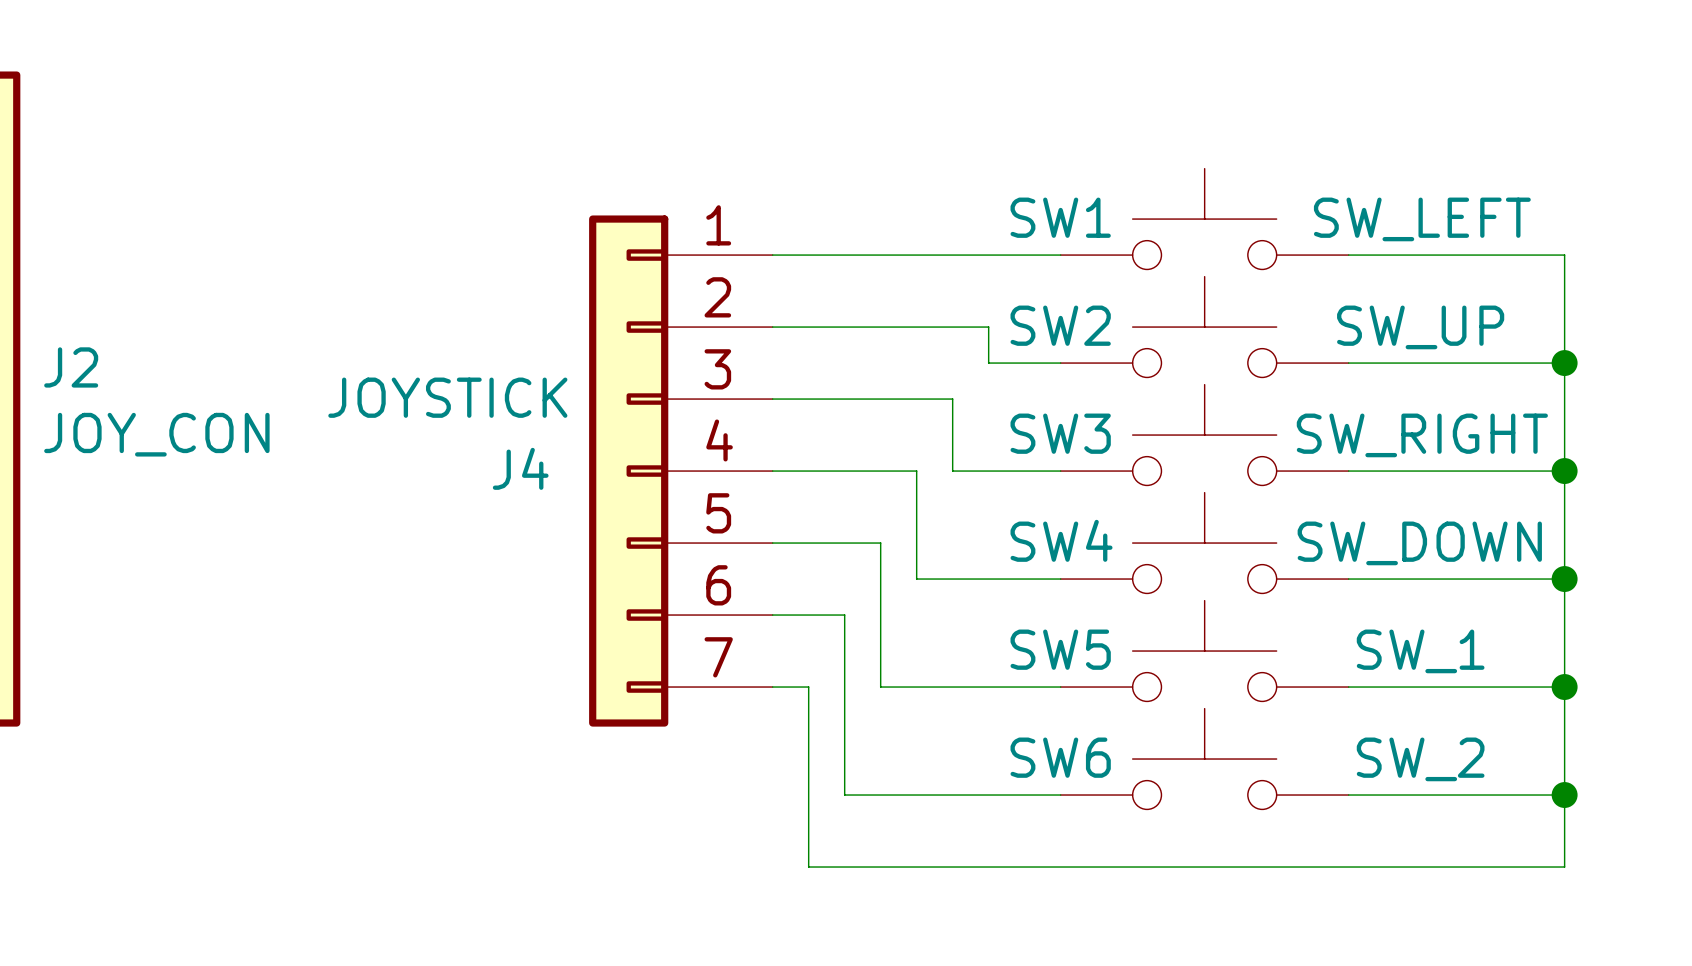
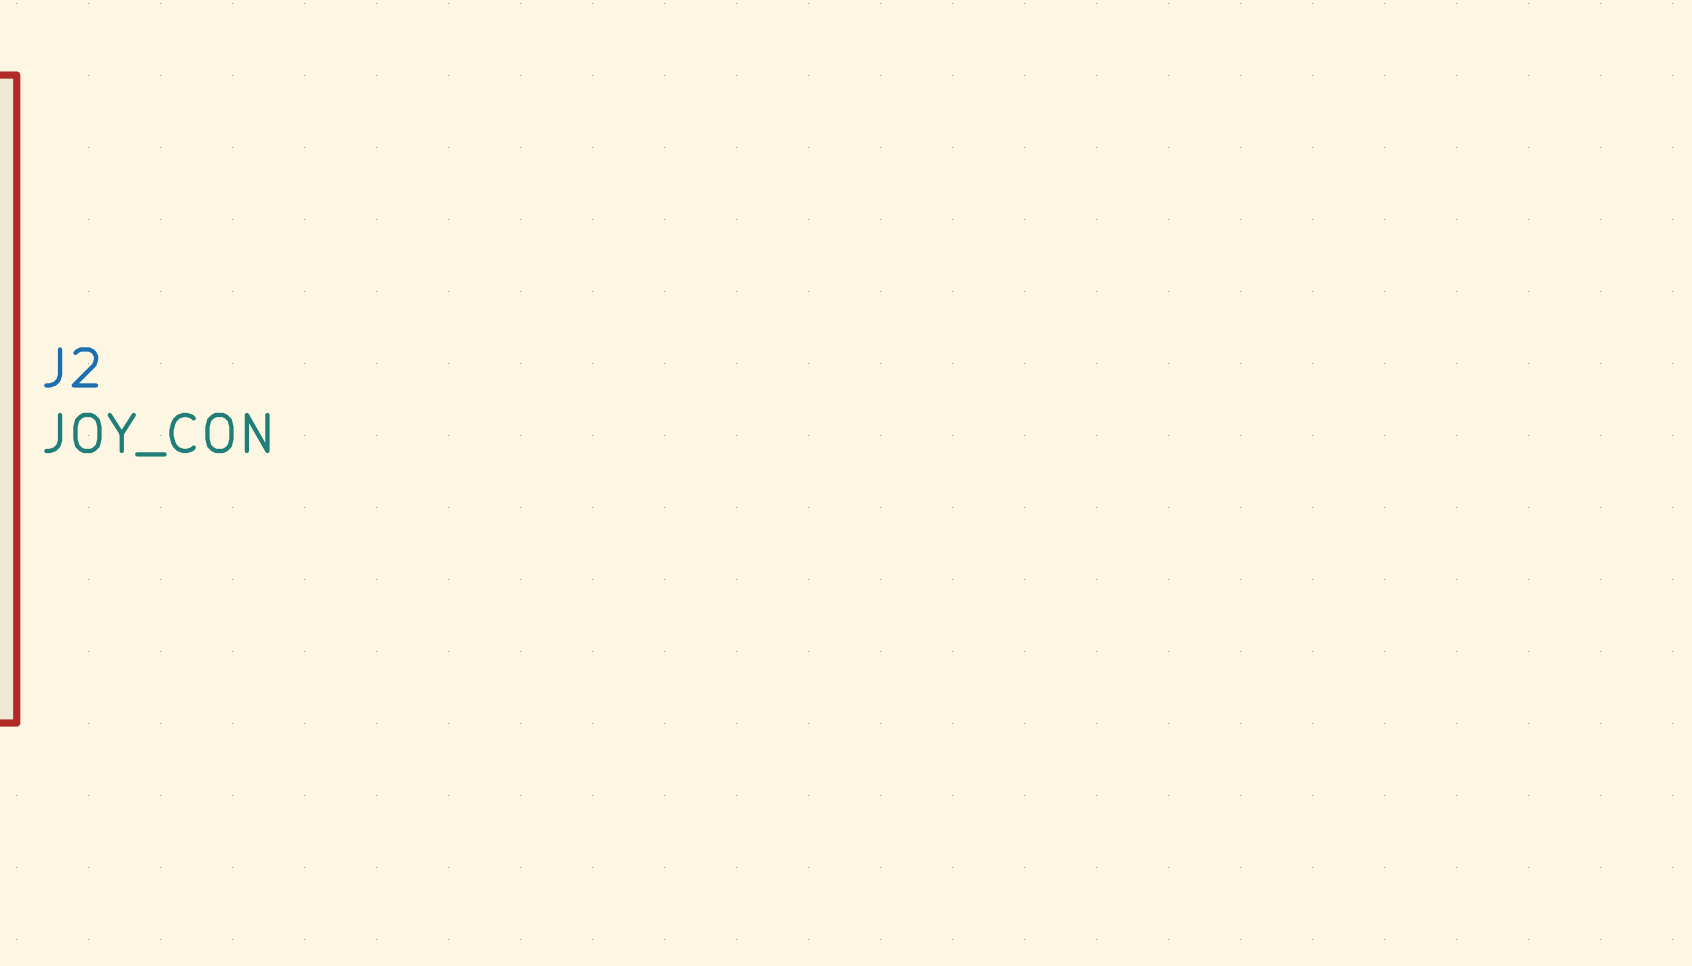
SW1: SW_LEFT (1204, 219) -> none
wire: (772, 255) (1060, 255) -> none
wire: (1348, 255) (1564, 255) (1564, 867) (808, 867) (808, 687) (772, 687) -> none
wire: (772, 327) (988, 327) (988, 363) (1060, 363) -> none
SW2: SW_UP (1204, 327) -> none
wire: (1348, 363) (1564, 363) -> none
junction: (1564, 363) -> none
wire: (772, 399) (952, 399) (952, 471) (1060, 471) -> none
SW3: SW_RIGHT (1204, 435) -> none
J4: JOYSTICK (680, 471) -> none
wire: (772, 471) (916, 471) (916, 579) (1060, 579) -> none
wire: (1348, 471) (1564, 471) -> none
junction: (1564, 471) -> none
wire: (772, 543) (880, 543) (880, 687) (1060, 687) -> none
SW4: SW_DOWN (1204, 543) -> none
wire: (1348, 579) (1564, 579) -> none
junction: (1564, 579) -> none
wire: (772, 615) (844, 615) (844, 795) (1060, 795) -> none
SW5: SW_1 (1204, 651) -> none
wire: (1348, 687) (1564, 687) -> none
junction: (1564, 687) -> none
SW6: SW_2 (1204, 759) -> none
wire: (1348, 795) (1564, 795) -> none
junction: (1564, 795) -> none

